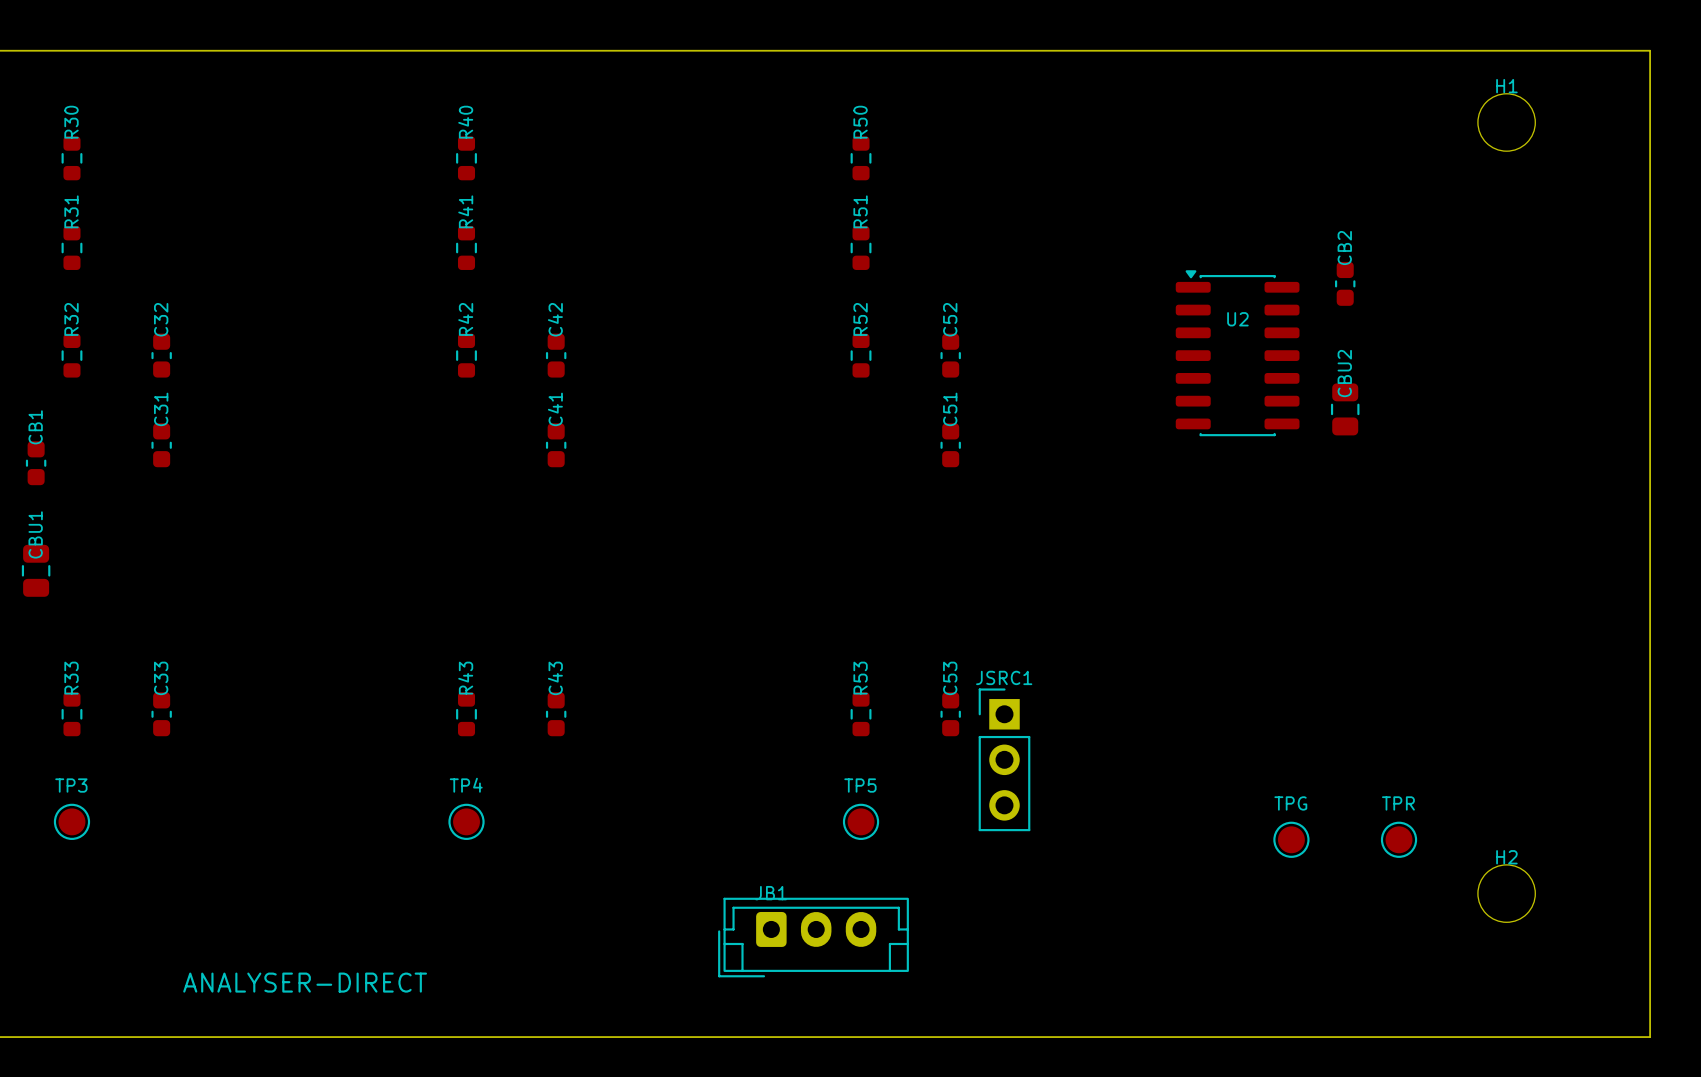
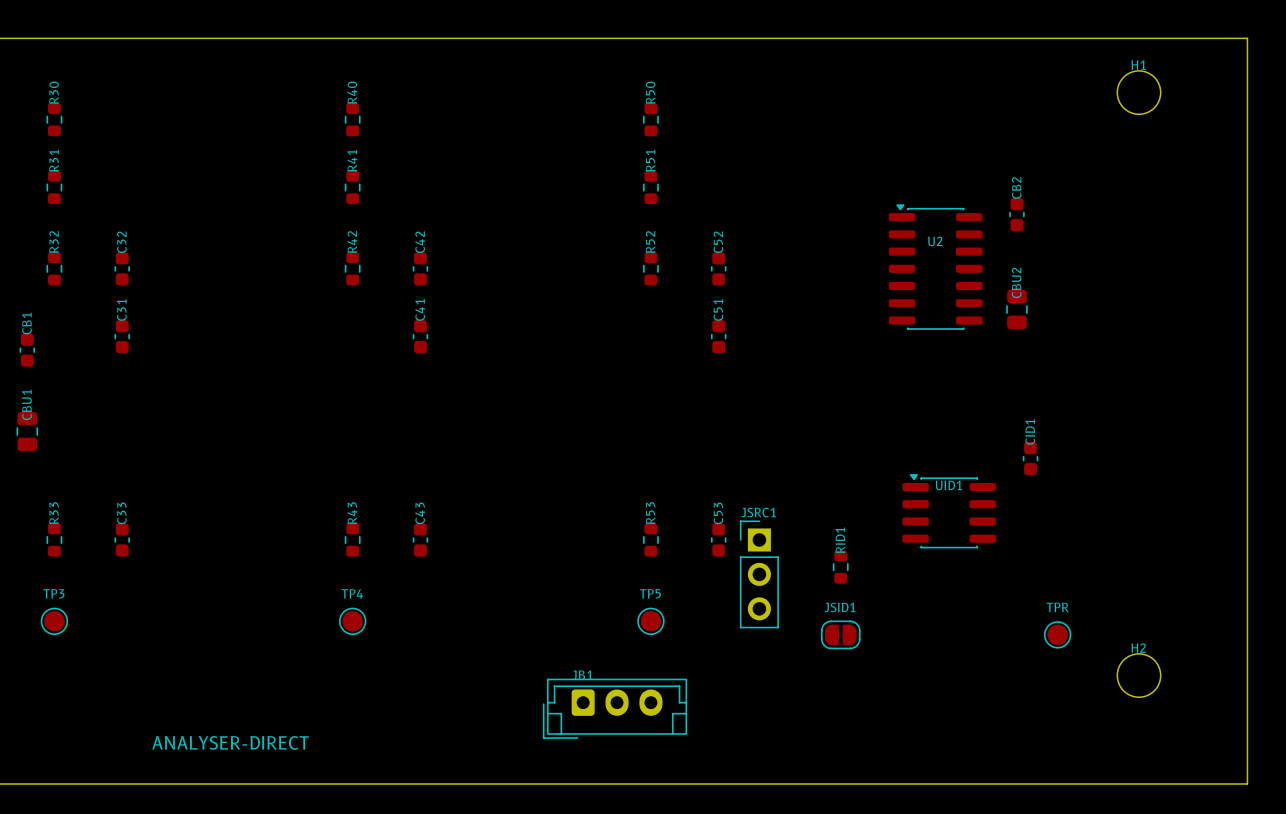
CID1: none -> (1030, 458)
UID1: none -> (949, 511)
RID1: none -> (840, 567)
JSID1: none -> (840, 634)
TPG: (1291, 839) -> none

